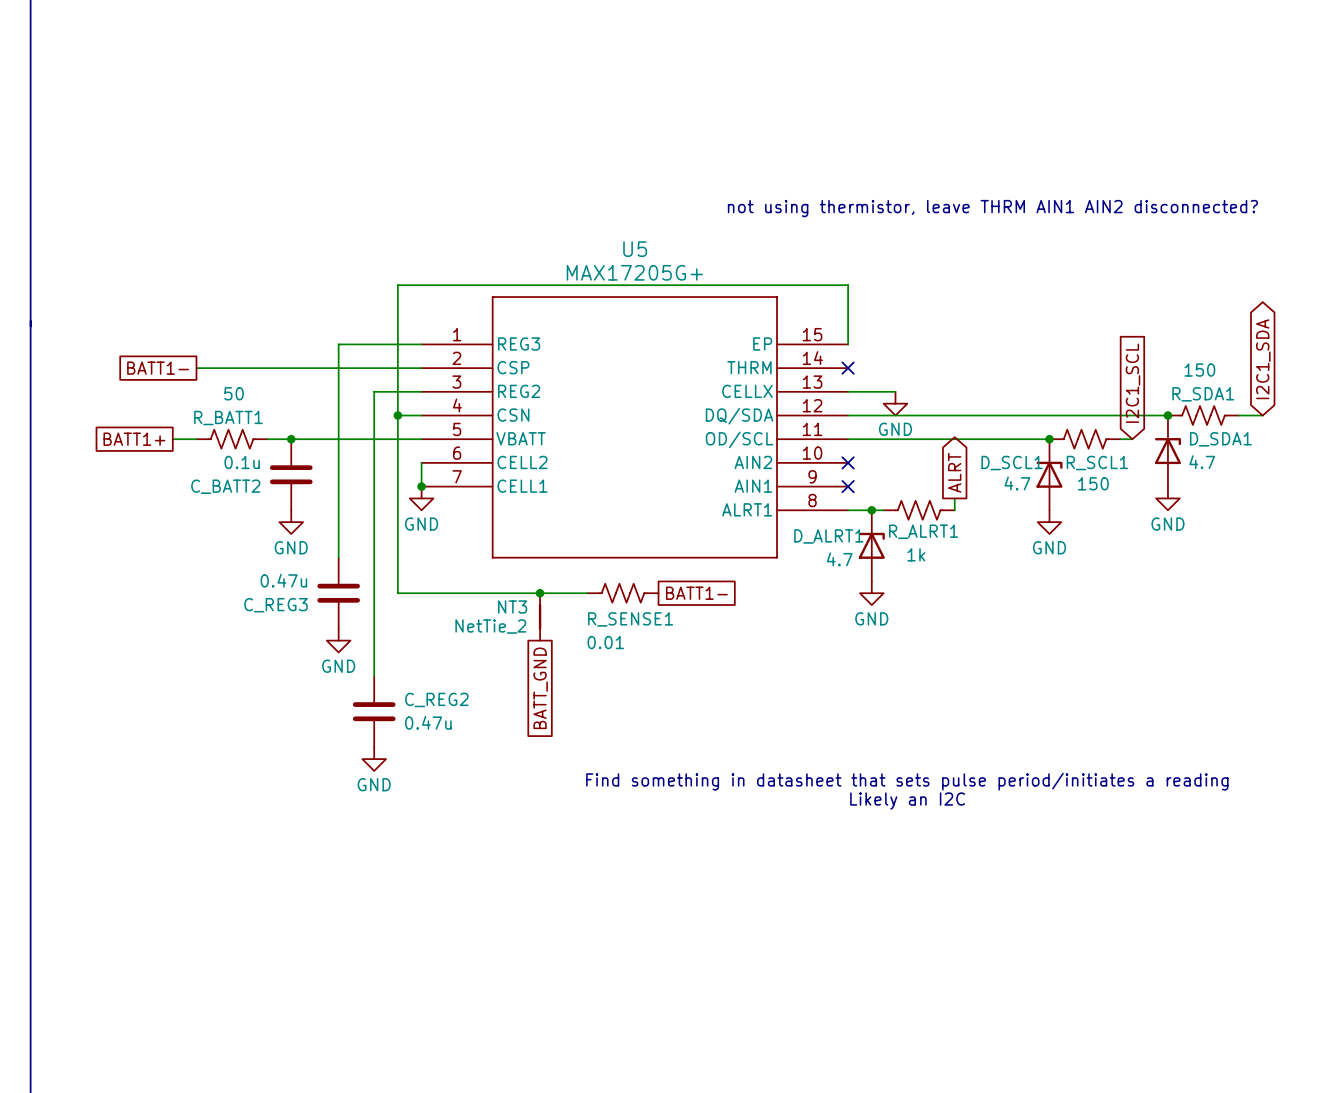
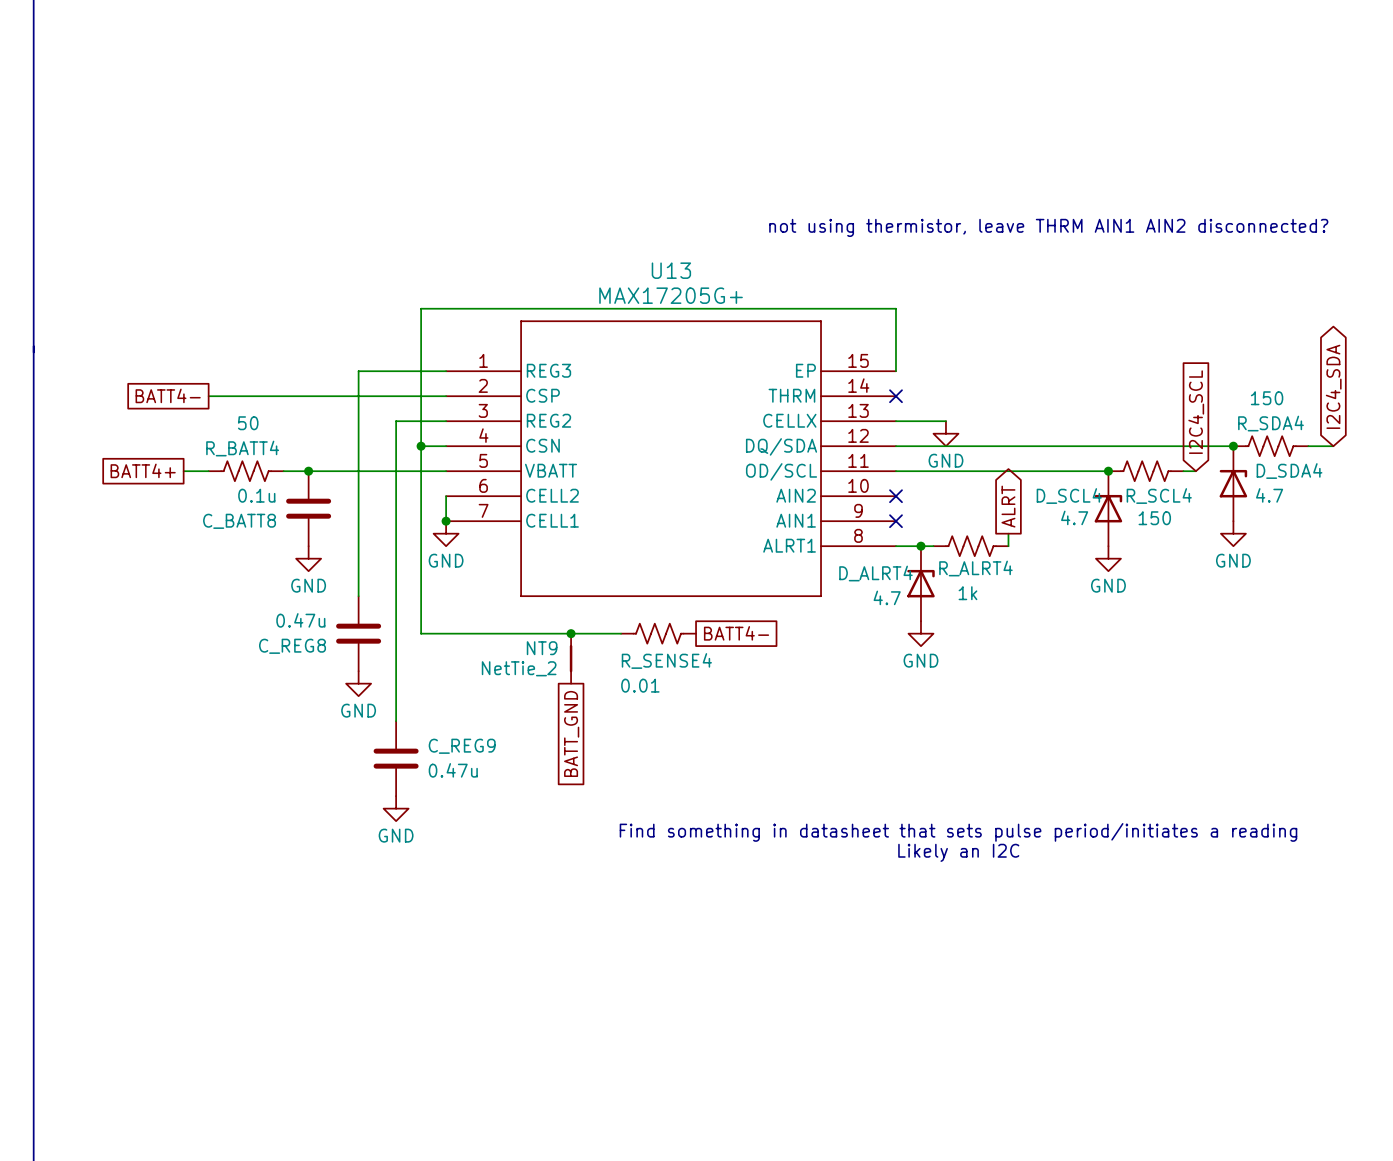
U5 name: U5 (635, 249) -> U13 (671, 270)
global label: I2C1_SDA (1263, 359) -> I2C4_SDA (1333, 386)
global label: BATT1- (158, 368) -> BATT4- (168, 395)
global label: I2C1_SCL (1132, 383) -> I2C4_SCL (1196, 412)
R_SDA1 name: R_SDA1 (1203, 394) -> R_SDA4 (1271, 423)
R_BATT1 name: R_BATT1 (228, 418) -> R_BATT4 (242, 448)
global label: BATT1+ (134, 439) -> BATT4+ (143, 470)
D_SDA1 name: D_SDA1 (1220, 439) -> D_SDA4 (1289, 471)
D_SCL1 name: D_SCL1 (1012, 463) -> D_SCL4 (1069, 496)
R_SCL1 name: R_SCL1 (1097, 463) -> R_SCL4 (1159, 496)
C_BATT2 name: C_BATT2 (225, 486) -> C_BATT8 (239, 521)
R_ALRT1 name: R_ALRT1 (923, 531) -> R_ALRT4 (975, 568)
D_ALRT1 name: D_ALRT1 (828, 536) -> D_ALRT4 (875, 573)
global label: BATT1- (696, 593) -> BATT4- (736, 633)
C_REG3 name: C_REG3 (276, 605) -> C_REG8 (292, 646)
NT3 name: NT3 (512, 607) -> NT9 (542, 648)
R_SENSE1 name: R_SENSE1 (630, 619) -> R_SENSE4 (666, 660)
C_REG2 name: C_REG2 (436, 699) -> C_REG9 (462, 746)

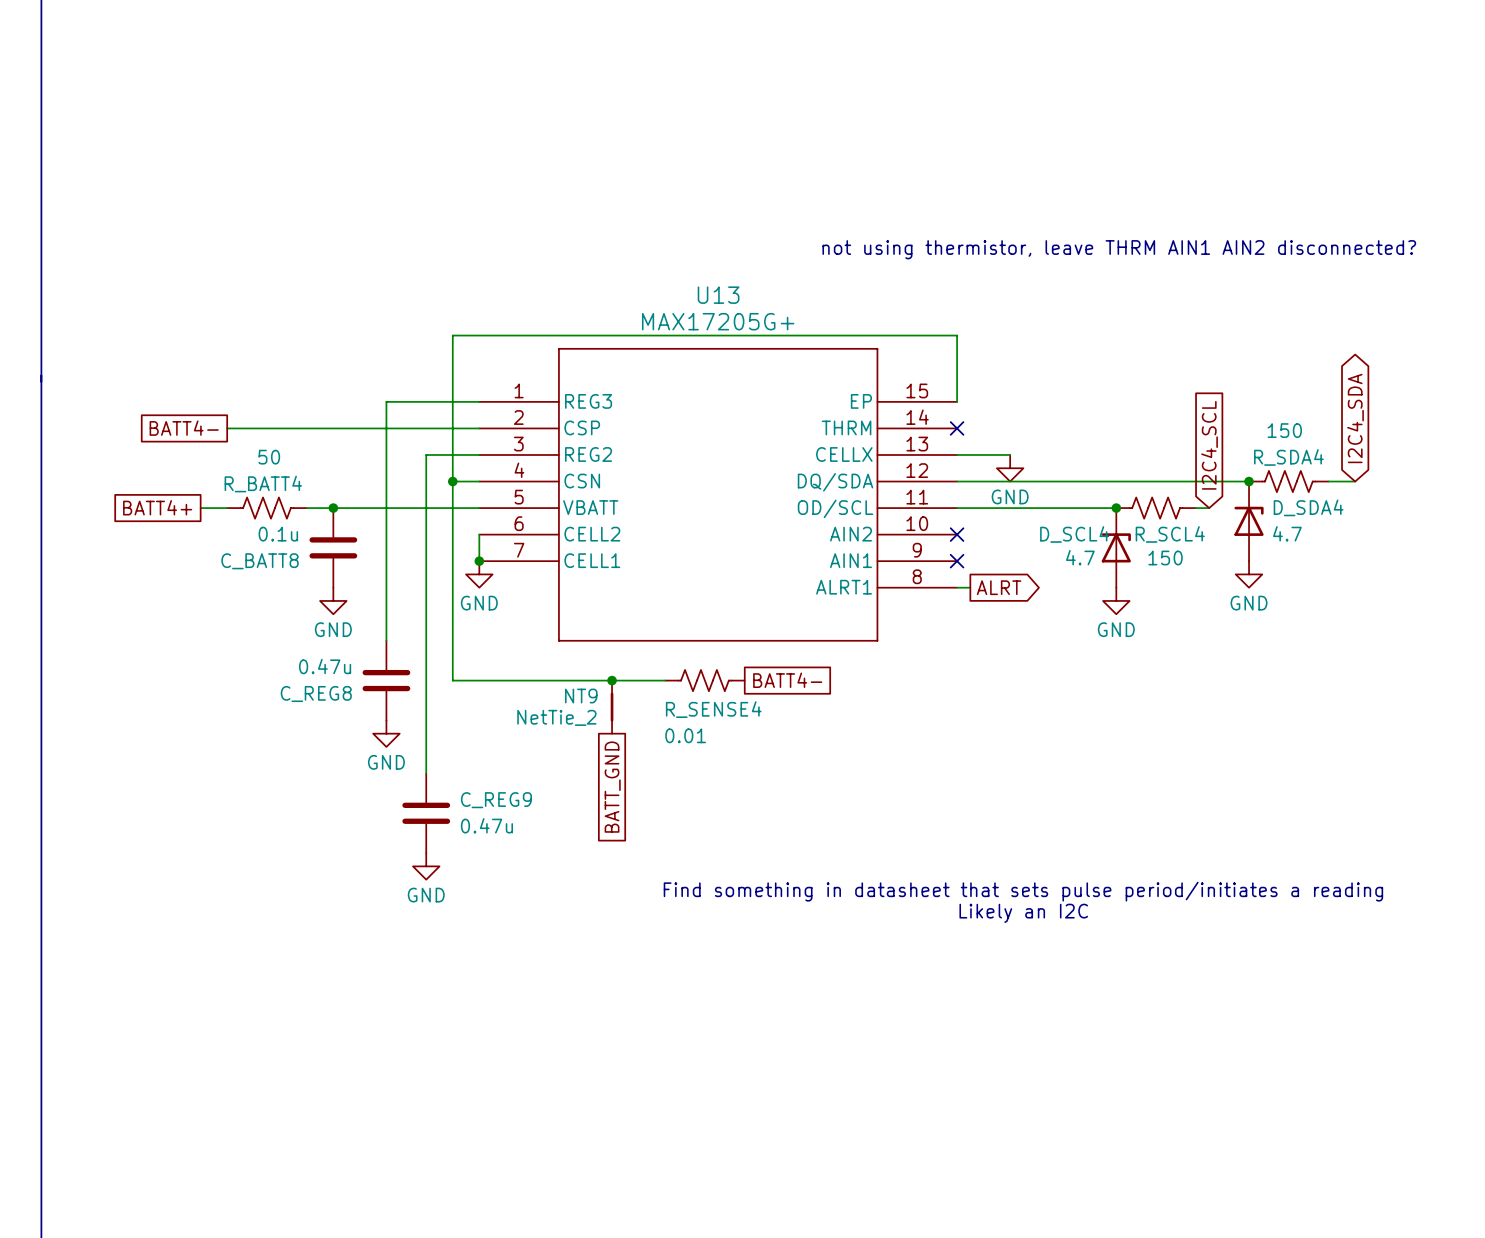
global label position: I2C4_SDA (1333, 386) -> I2C4_SDA (1355, 418)
global label position: I2C4_SCL (1196, 412) -> I2C4_SCL (1209, 445)
wire: (1170, 446) (1233, 446) -> none
junction: none -> (1249, 481)
junction: (1233, 446) -> none
R_SDA4 position: (1270, 446) -> (1288, 481)
wire: (1308, 446) (1333, 446) -> (1328, 481) (1355, 481)
wire: (1045, 471) (1108, 471) -> none
junction: none -> (1116, 508)
junction: (1108, 471) -> none
R_SCL4 position: (1145, 471) -> (1156, 508)
wire: (1183, 471) (1195, 471) -> (1195, 508) (1209, 508)
D_SDA4 position: (1233, 483) -> (1249, 521)
global label rotation: 0° (1008, 506) -> 90° clockwise (999, 587)
D_SCL4 position: (1108, 508) -> (1116, 547)
wire: (1008, 533) (1008, 546) -> none
power symbol: none -> GND (1249, 574)
power symbol: GND (1233, 533) -> none
wire: (908, 546) (933, 546) -> none
junction: (920, 546) -> none
R_ALRT4: 1k (970, 546) -> none
power symbol: none -> GND (1116, 600)
power symbol: GND (1108, 558) -> none
D_ALRT4: 4.7 (920, 583) -> none
power symbol: GND (920, 633) -> none

